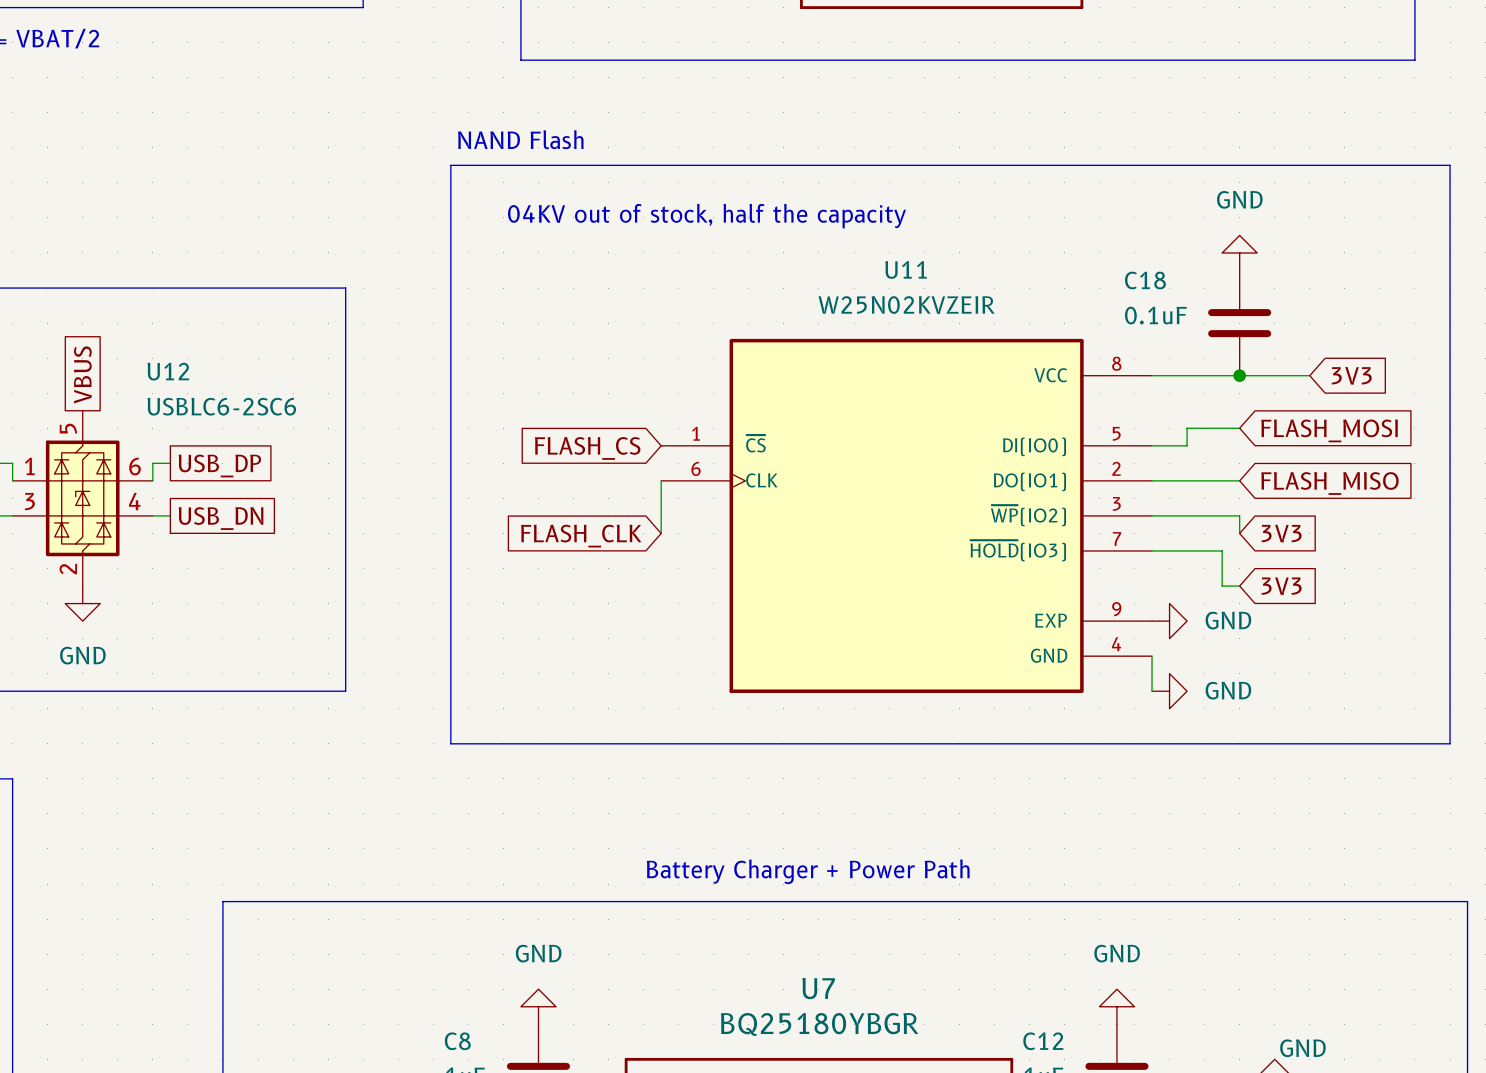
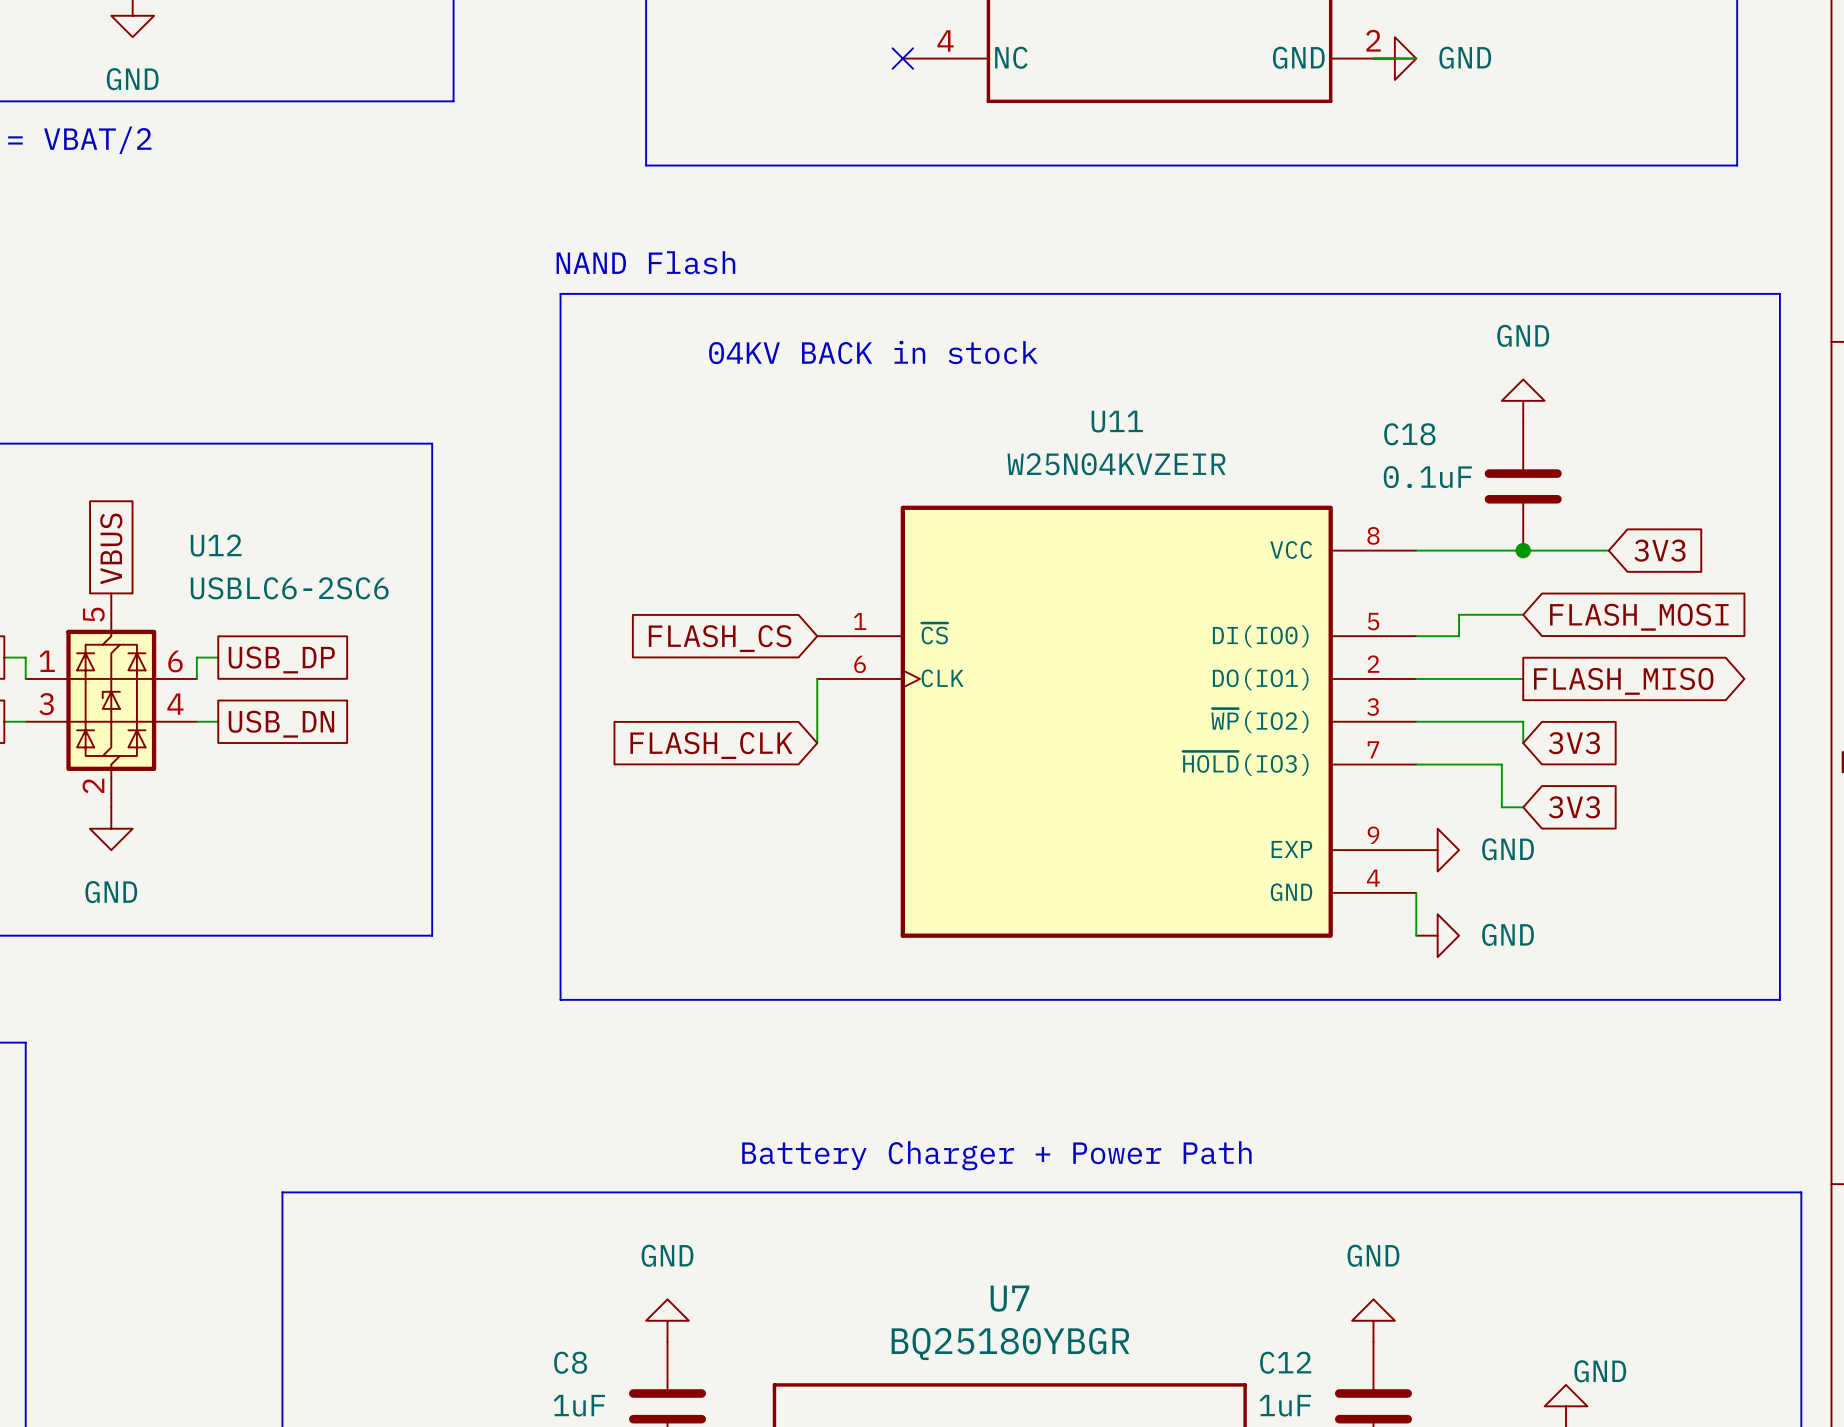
text: 04KV out of stock, half the capacity (707, 216) -> 04KV BACK in stock (873, 352)
U11 value: W25N02KVZEIR (906, 305) -> W25N04KVZEIR (1116, 464)
global label shape: input (1329, 483) -> output (1623, 681)

